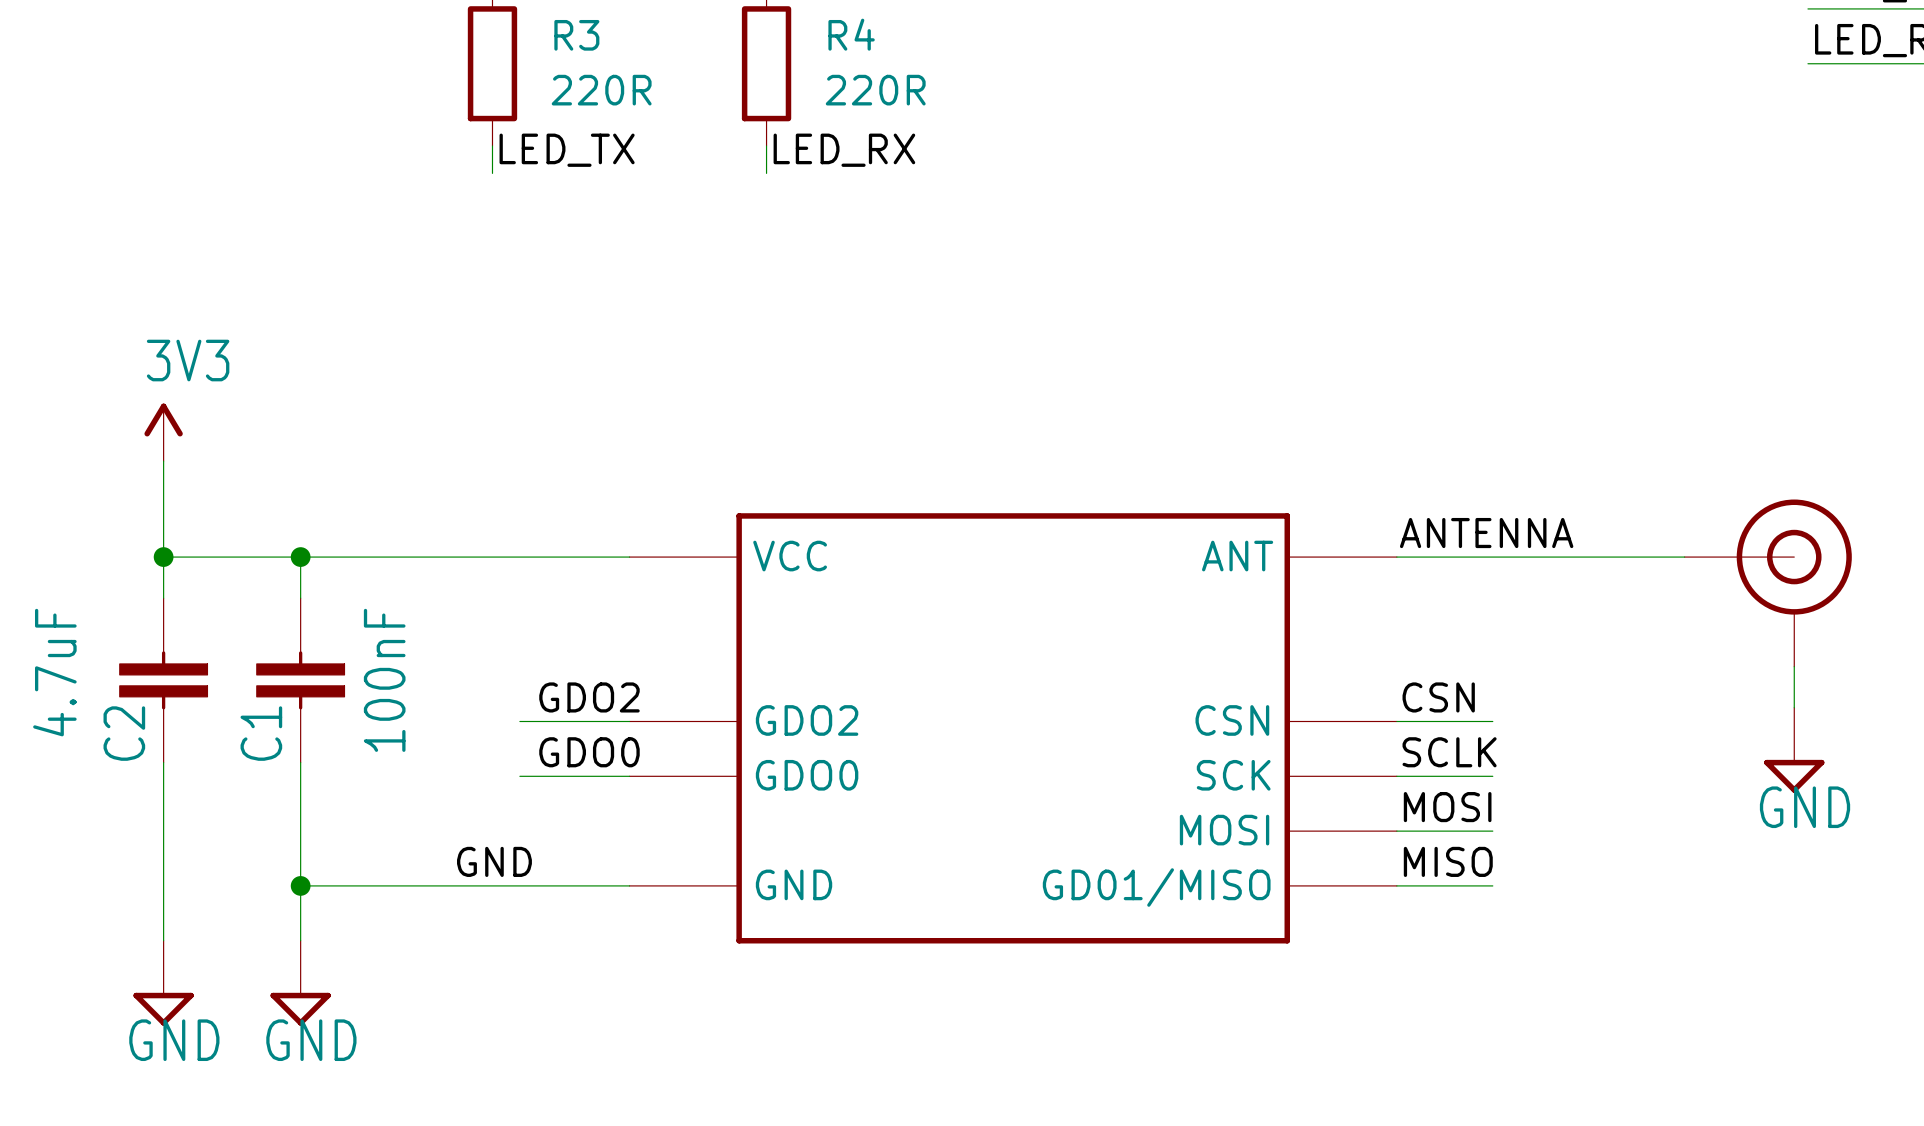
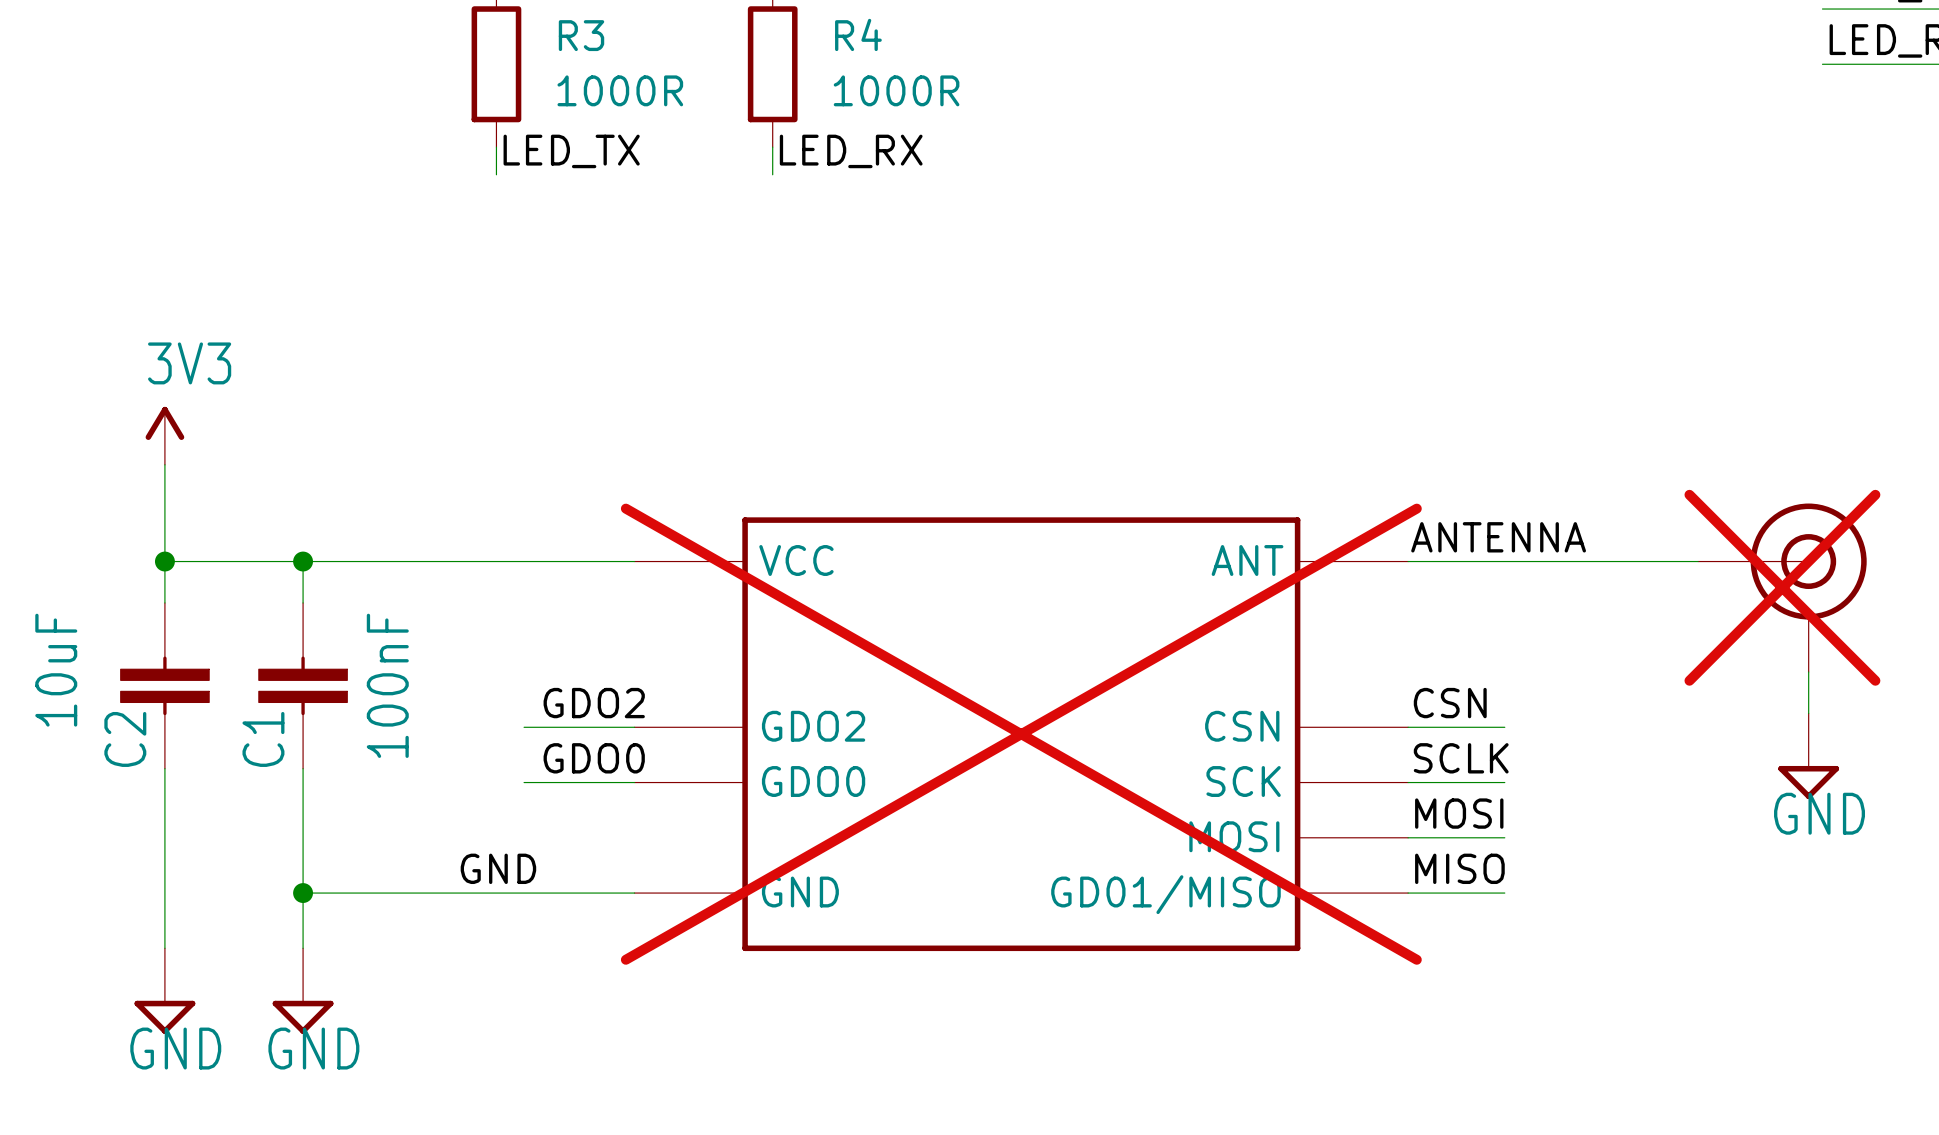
R3 value: 220R (601, 90) -> 1000R (620, 90)
R4 value: 220R (875, 90) -> 1000R (896, 90)
part do-not-place cross: none -> (1782, 587)
C2 value: 4.7uF (54, 672) -> 10uF (56, 670)
part do-not-place cross: none -> (1021, 734)

